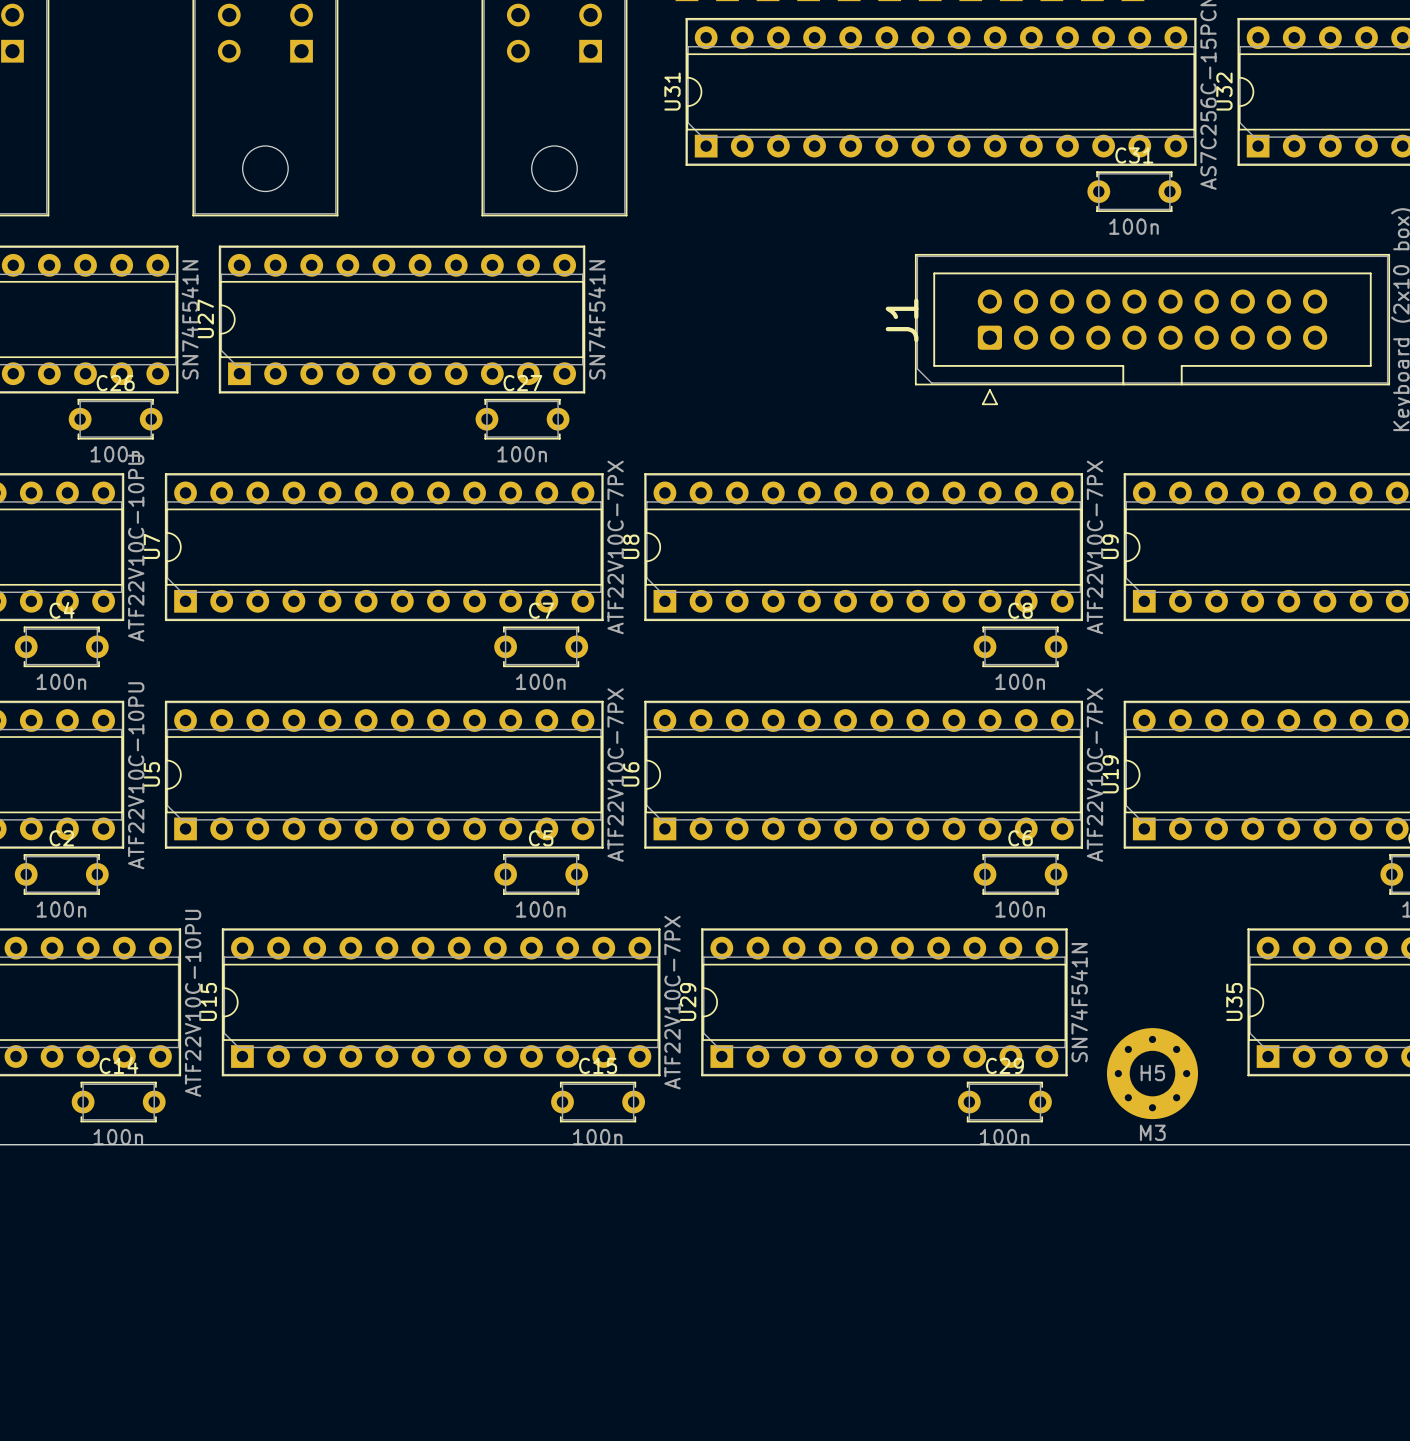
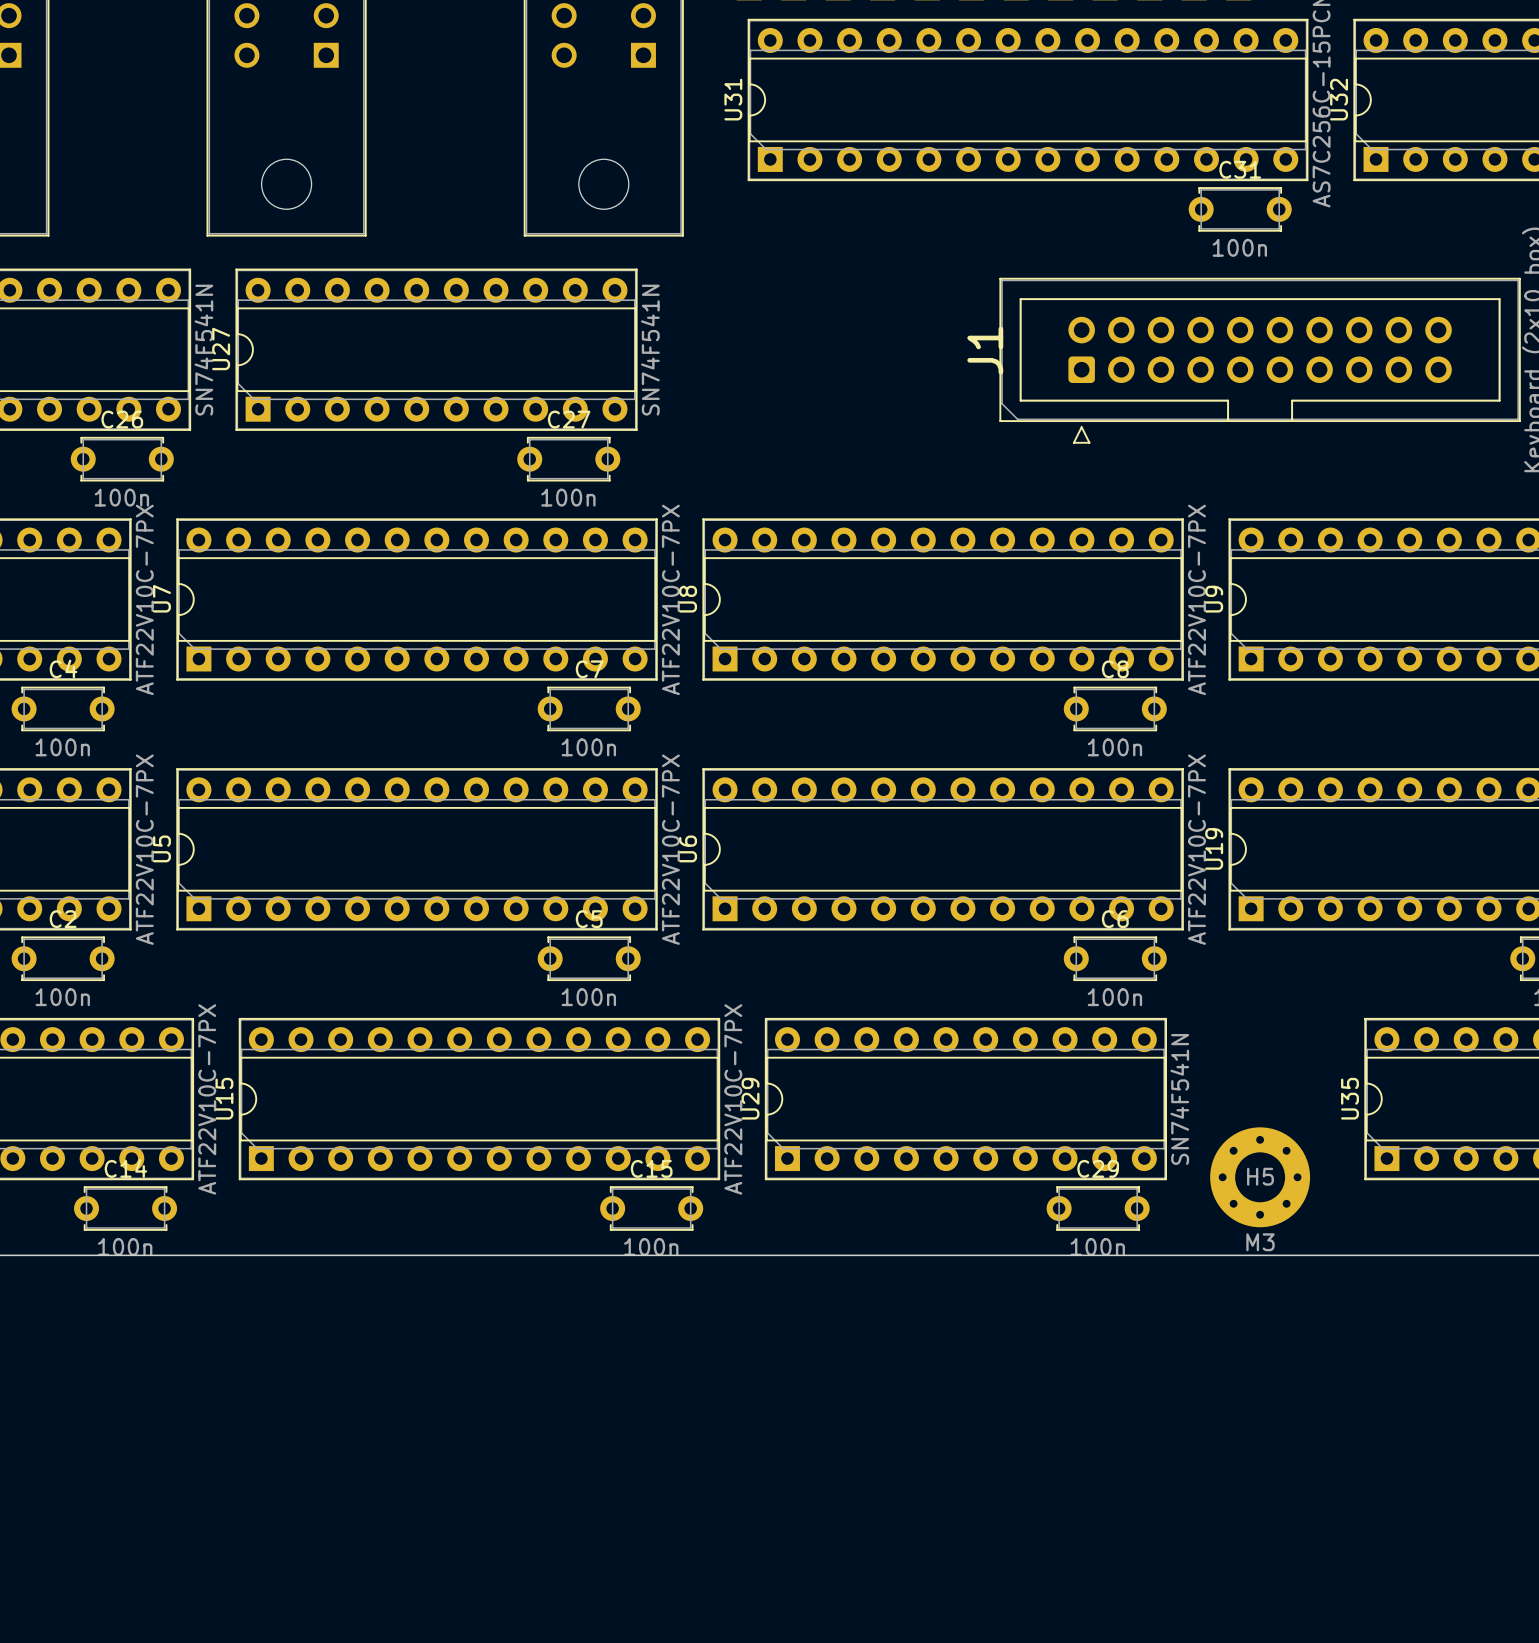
part value: ATF22V10C-10PU (136, 548) -> ATF22V10C-7PX (144, 599)
part value: ATF22V10C-10PU (136, 775) -> ATF22V10C-7PX (144, 849)
part value: ATF22V10C-10PU (193, 1003) -> ATF22V10C-7PX (207, 1099)

